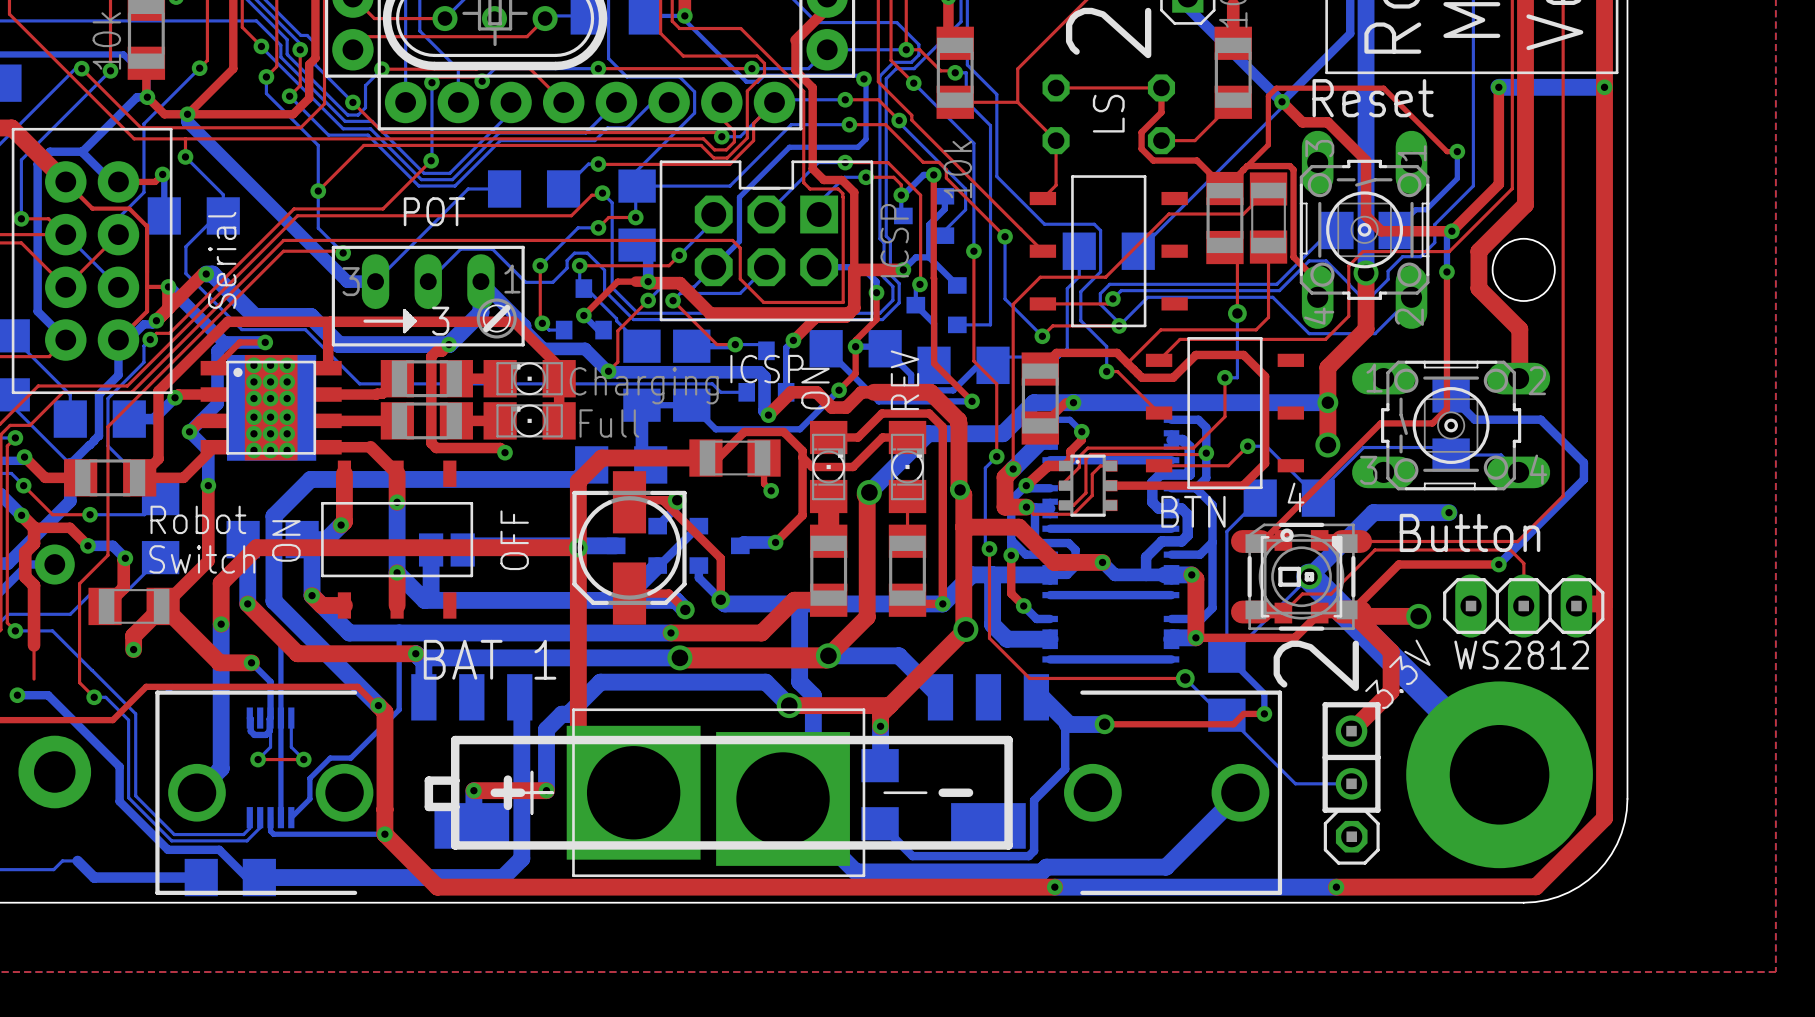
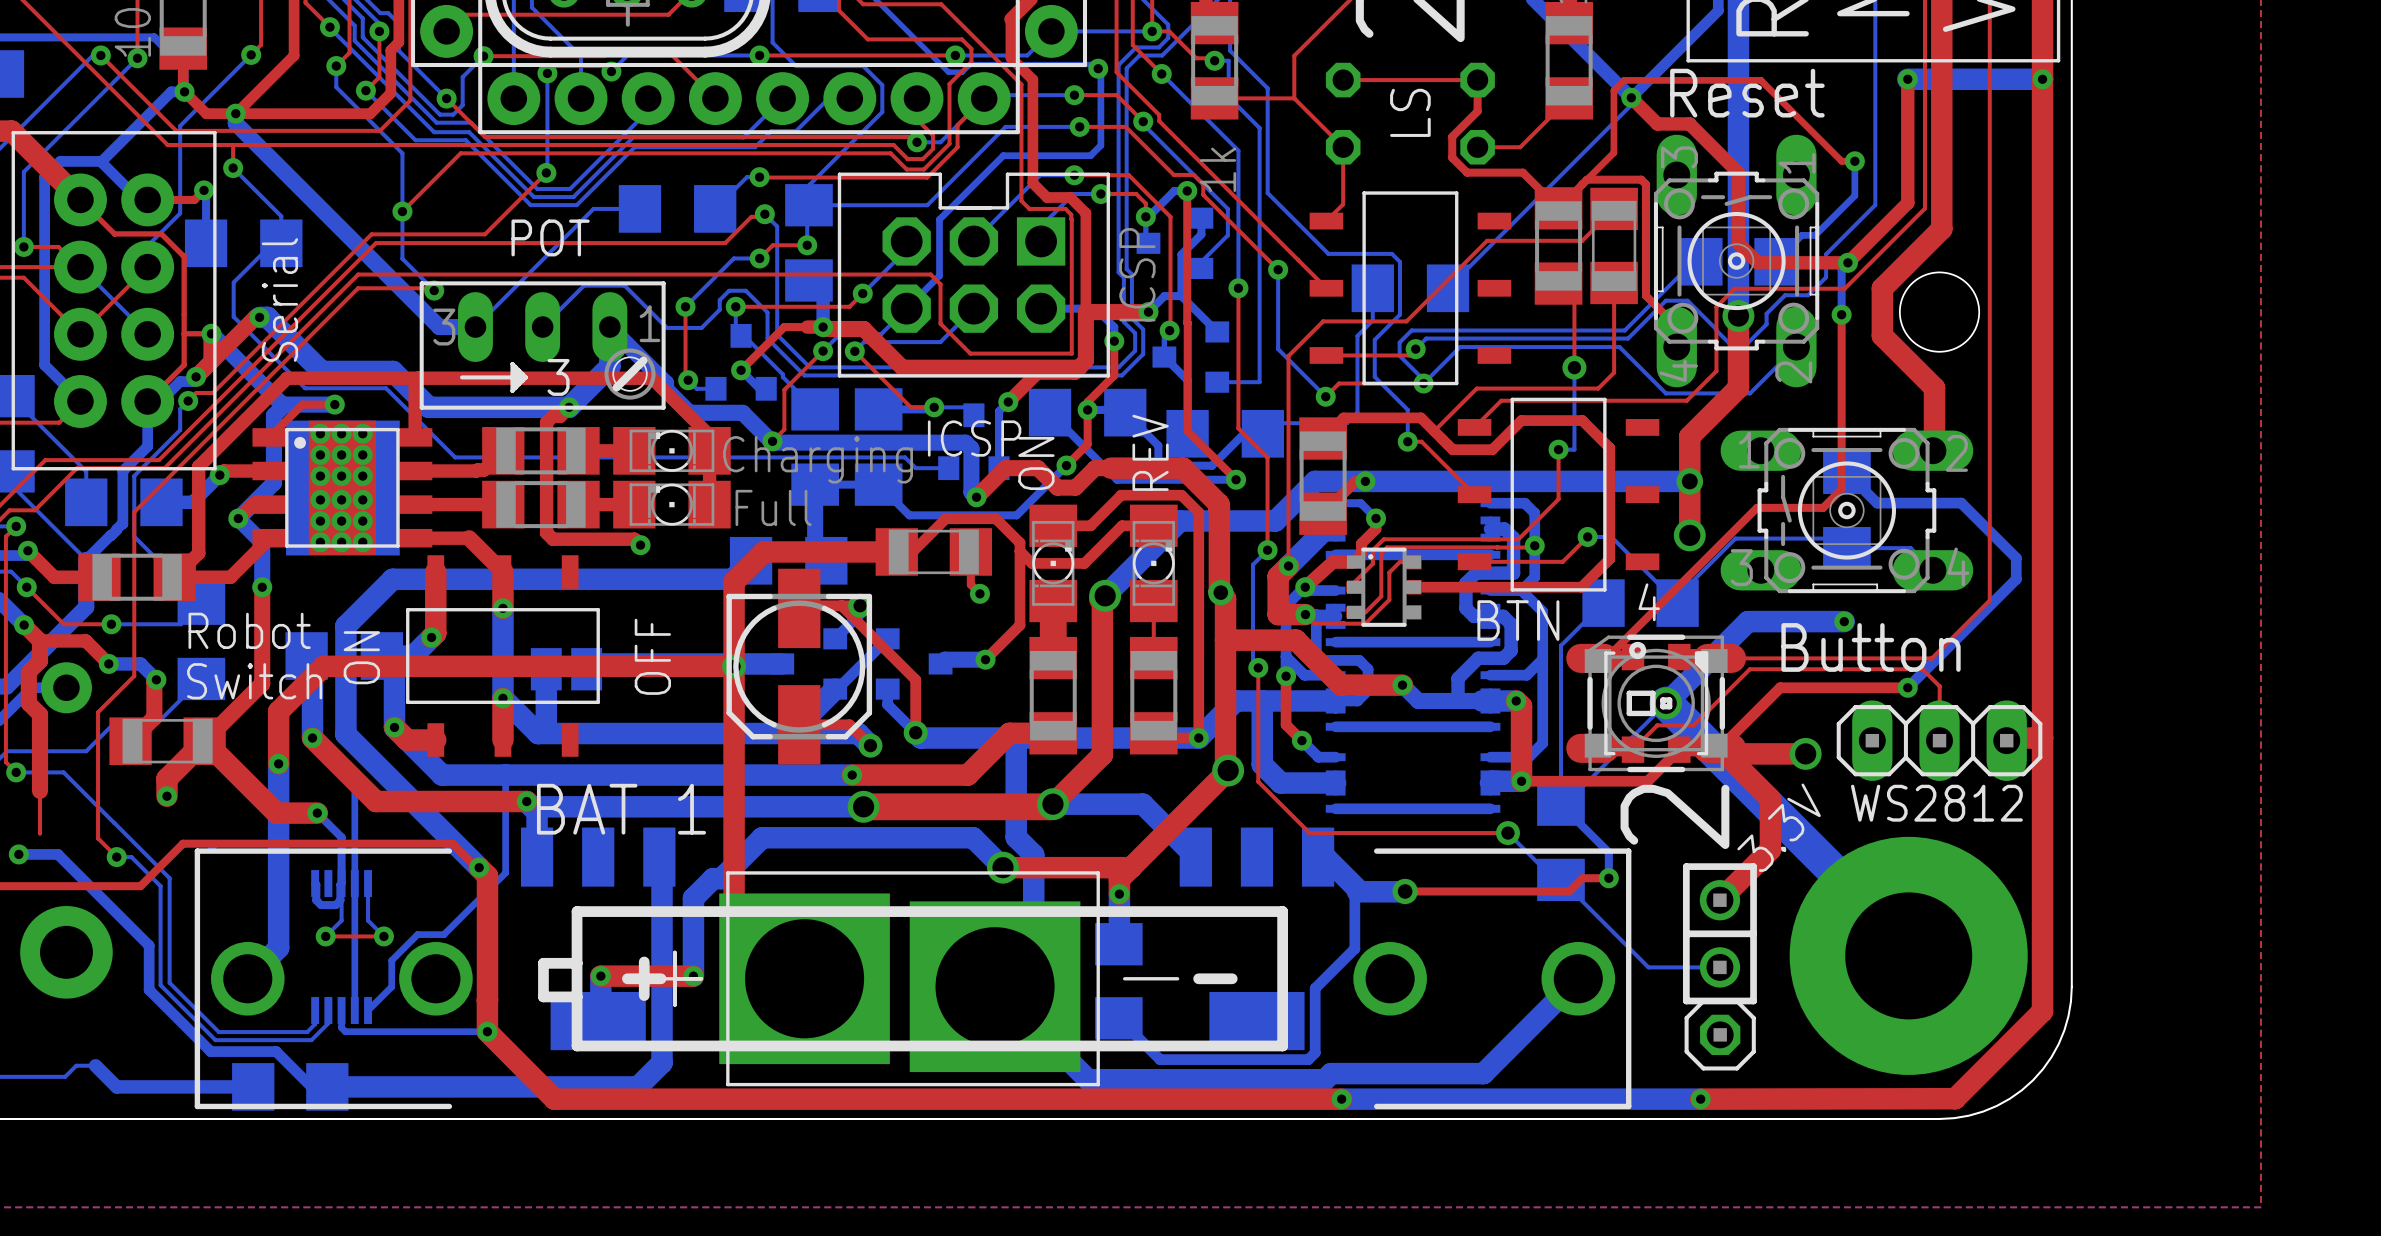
part value: 10k (957, 169) -> 1k (1218, 169)

